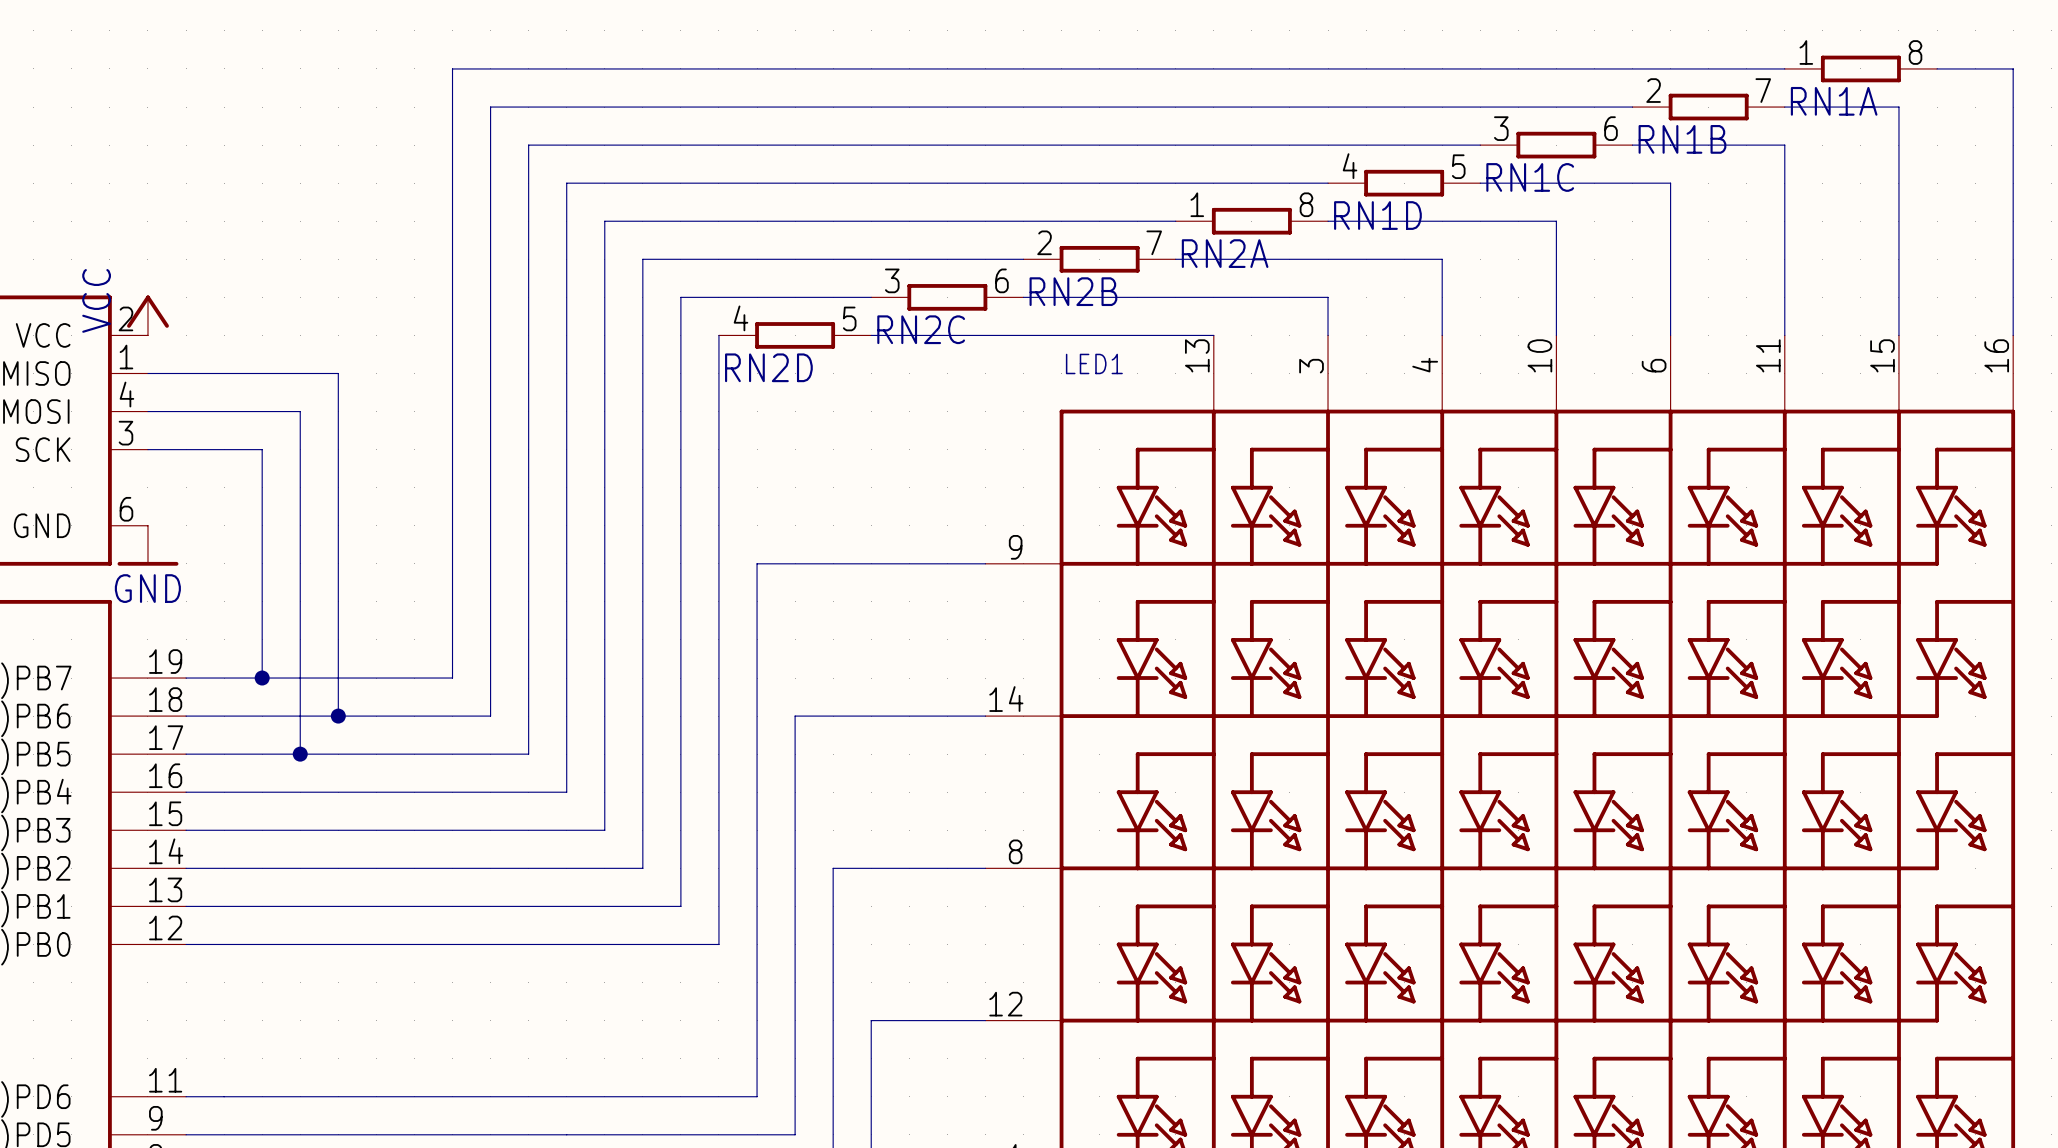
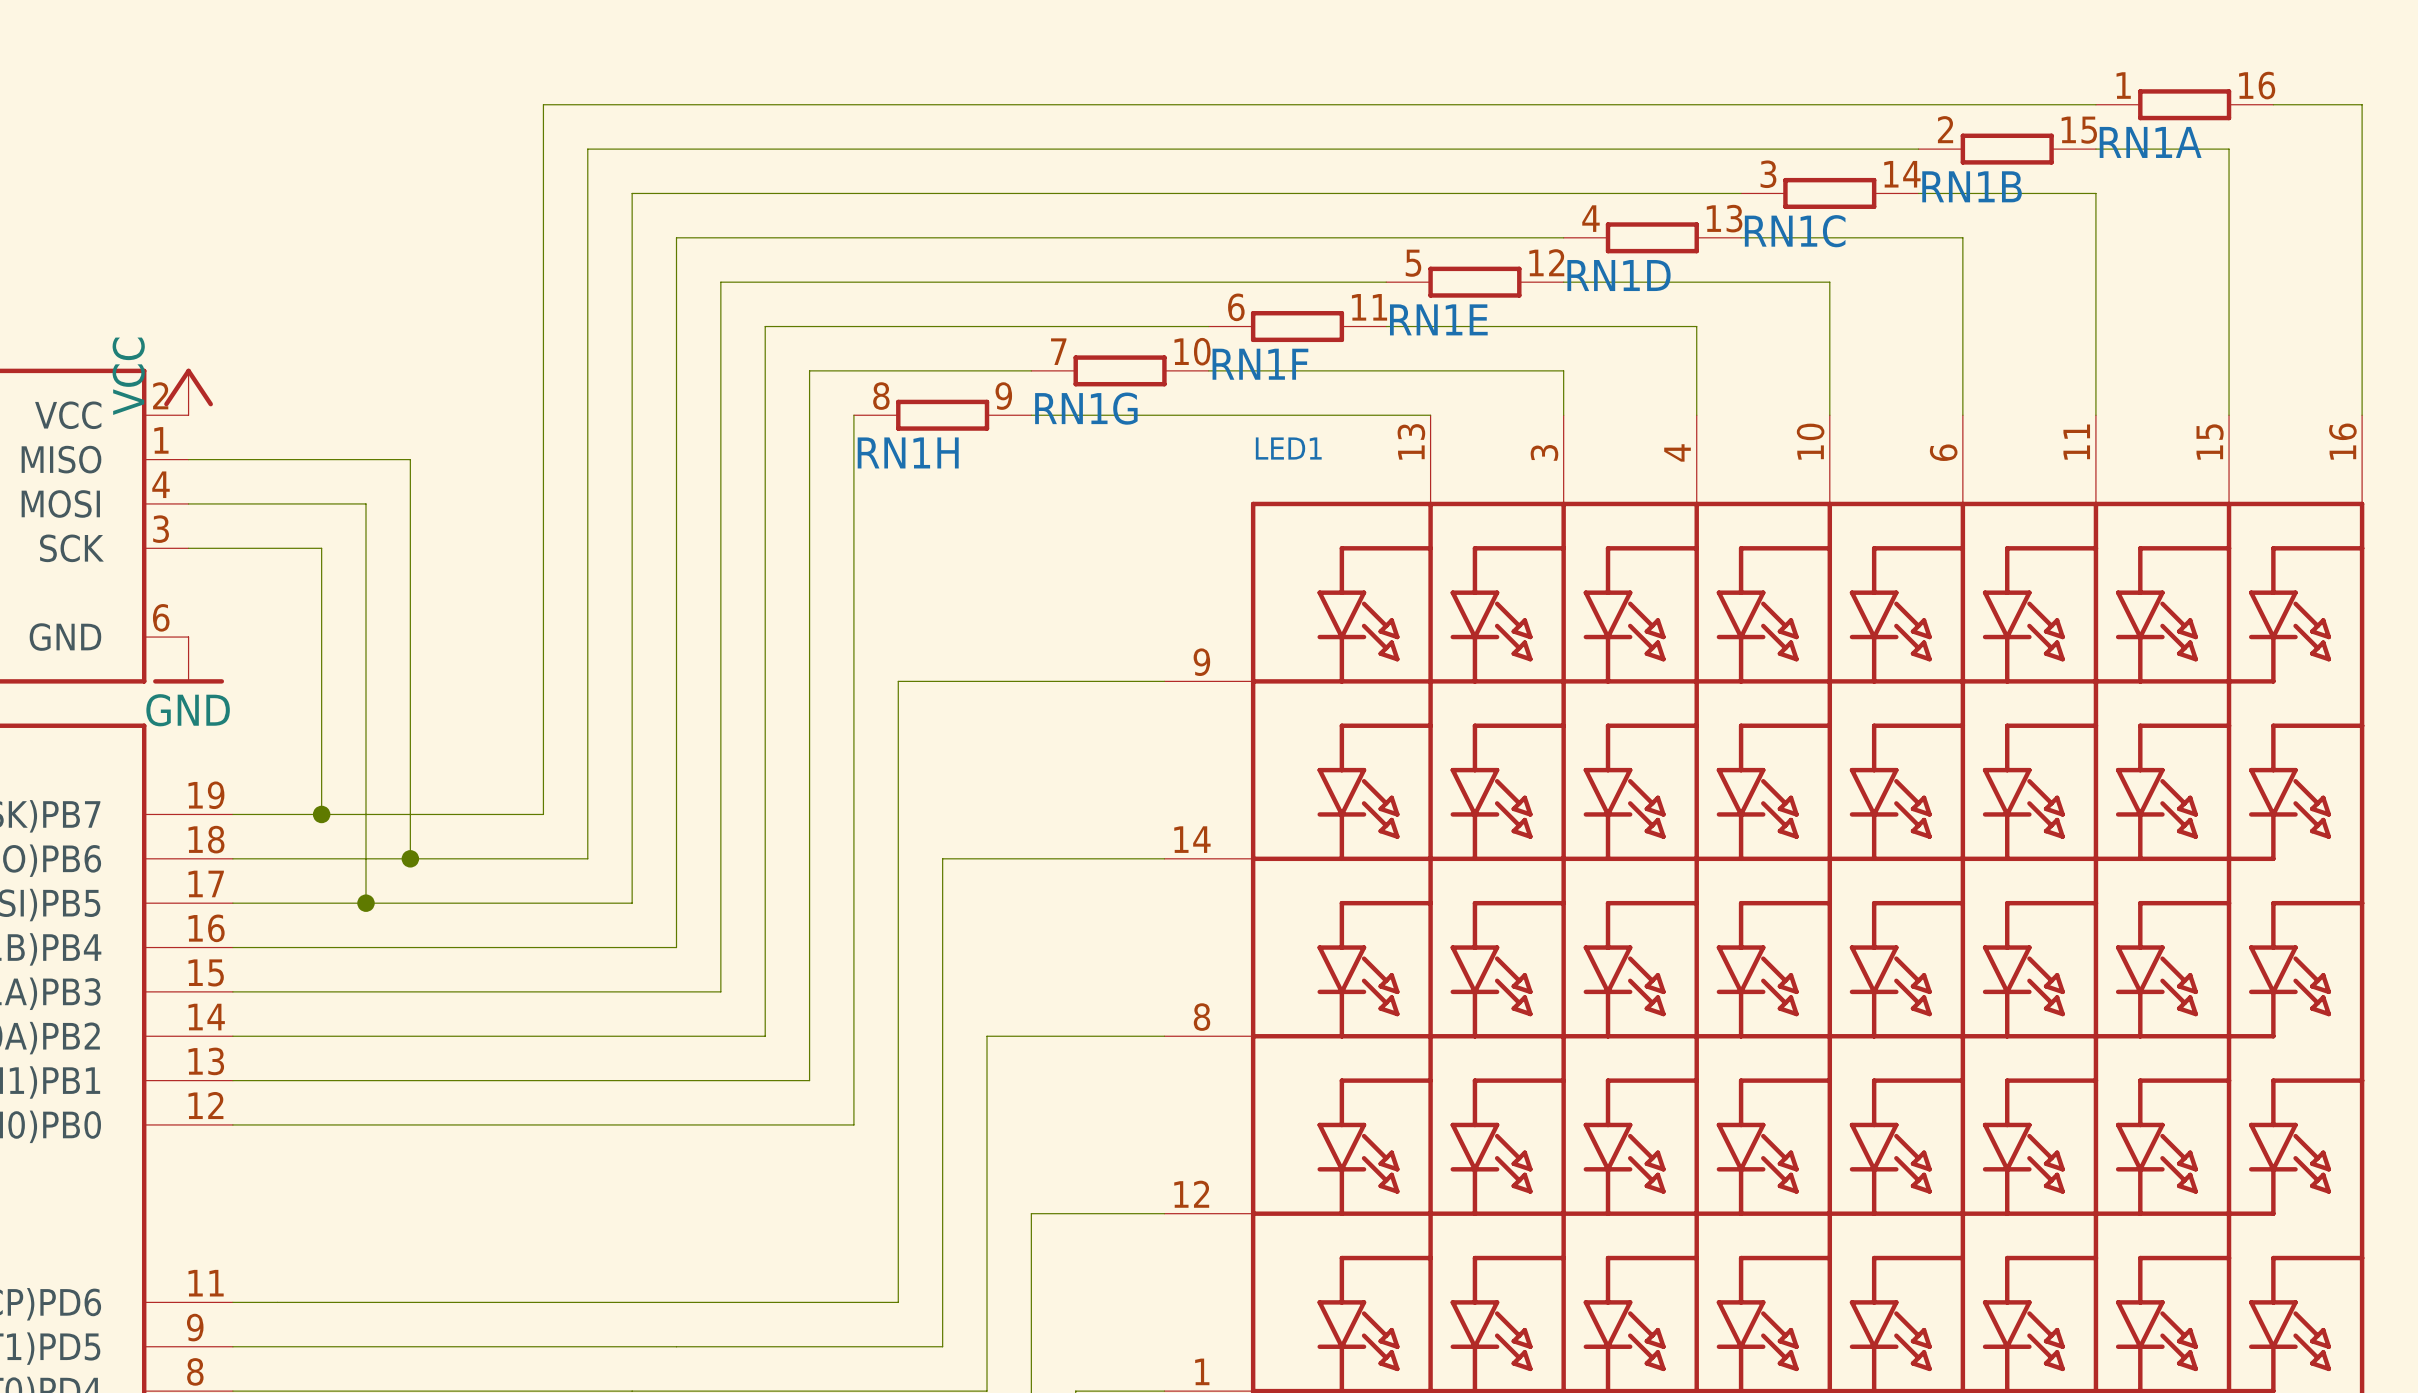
RN1A pin number: 8 (1915, 52) -> 16 (2257, 85)
RN1B pin number: 7 (1763, 90) -> 15 (2079, 130)
RN1C pin number: 6 (1610, 128) -> 14 (1902, 174)
RN1D pin number: 5 (1458, 166) -> 13 (1724, 218)
RN2A pin number: 1 (1197, 204) -> 5 (1413, 263)
RN2A pin number: 8 (1306, 204) -> 12 (1546, 262)
RN2B pin number: 2 (1044, 242) -> 6 (1236, 307)
RN2B pin number: 7 (1154, 242) -> 11 (1369, 307)
RN2A name: RN2A (1225, 253) -> RN1E (1438, 319)
RN2C pin number: 3 (892, 280) -> 7 (1058, 351)
RN2C pin number: 6 (1001, 280) -> 10 (1192, 351)
RN2B name: RN2B (1073, 291) -> RN1F (1260, 364)
RN2D pin number: 4 (740, 318) -> 8 (881, 396)
RN2D pin number: 5 (849, 318) -> 9 (1003, 396)
RN2C name: RN2C (921, 329) -> RN1G (1086, 408)
RN2D name: RN2D (768, 367) -> RN1H (908, 452)

